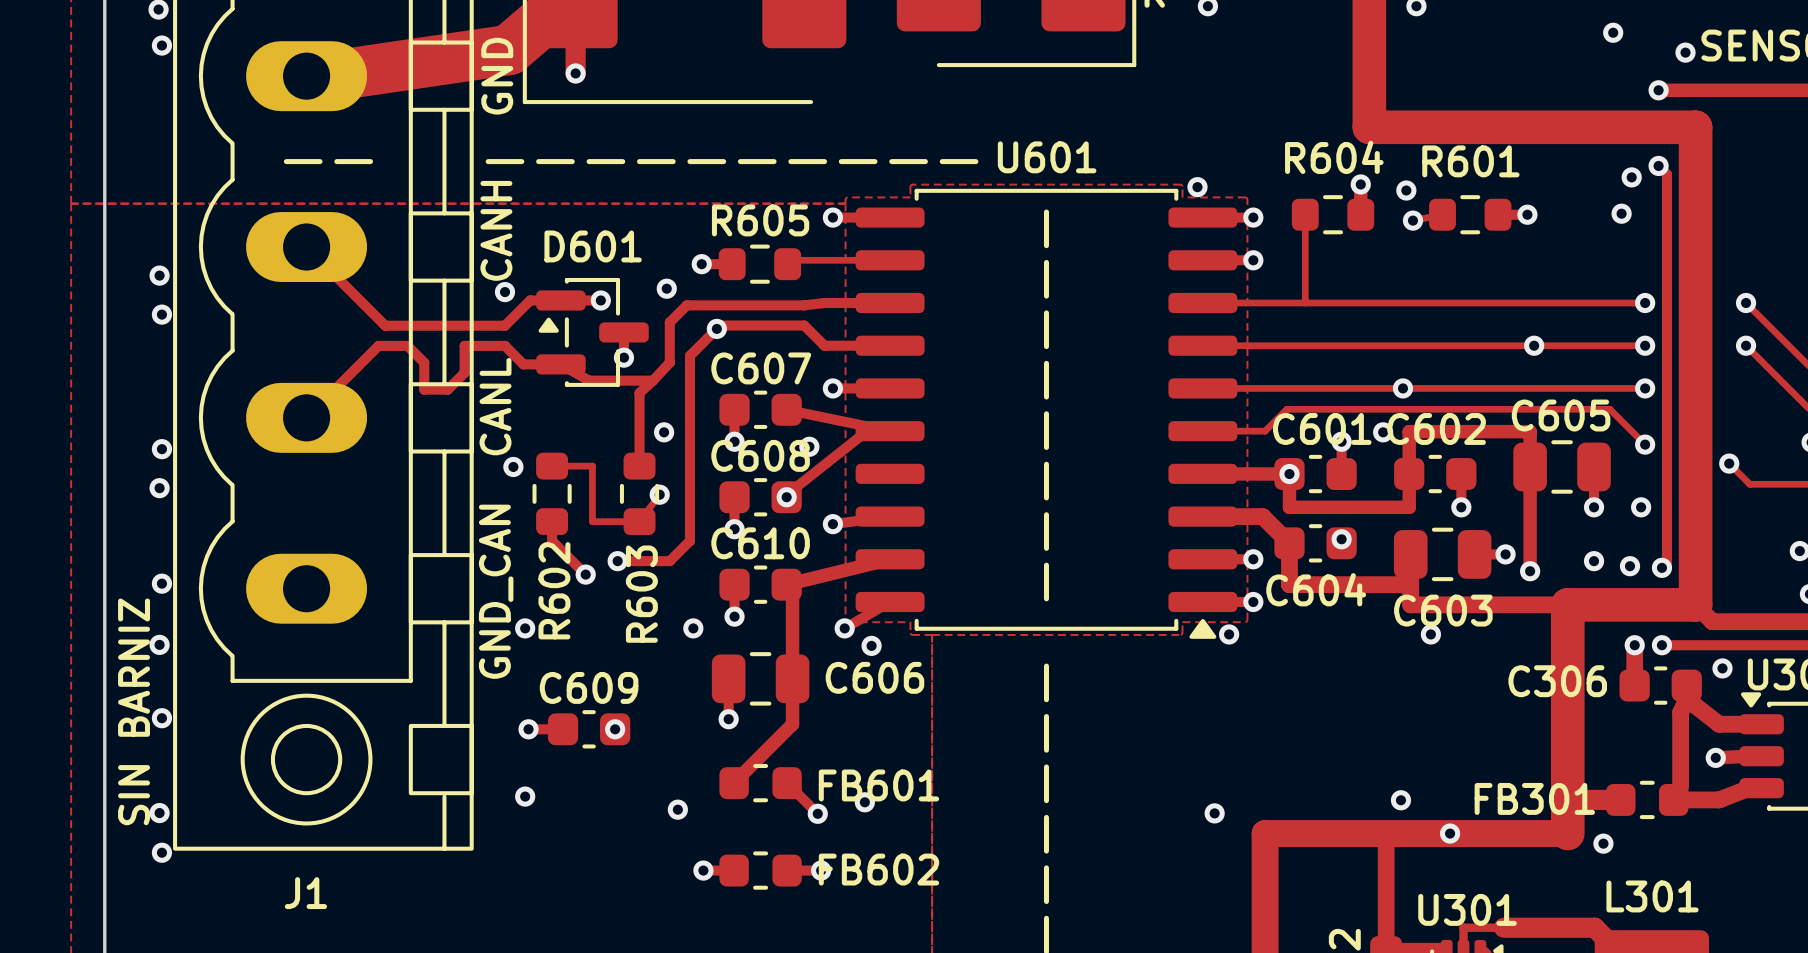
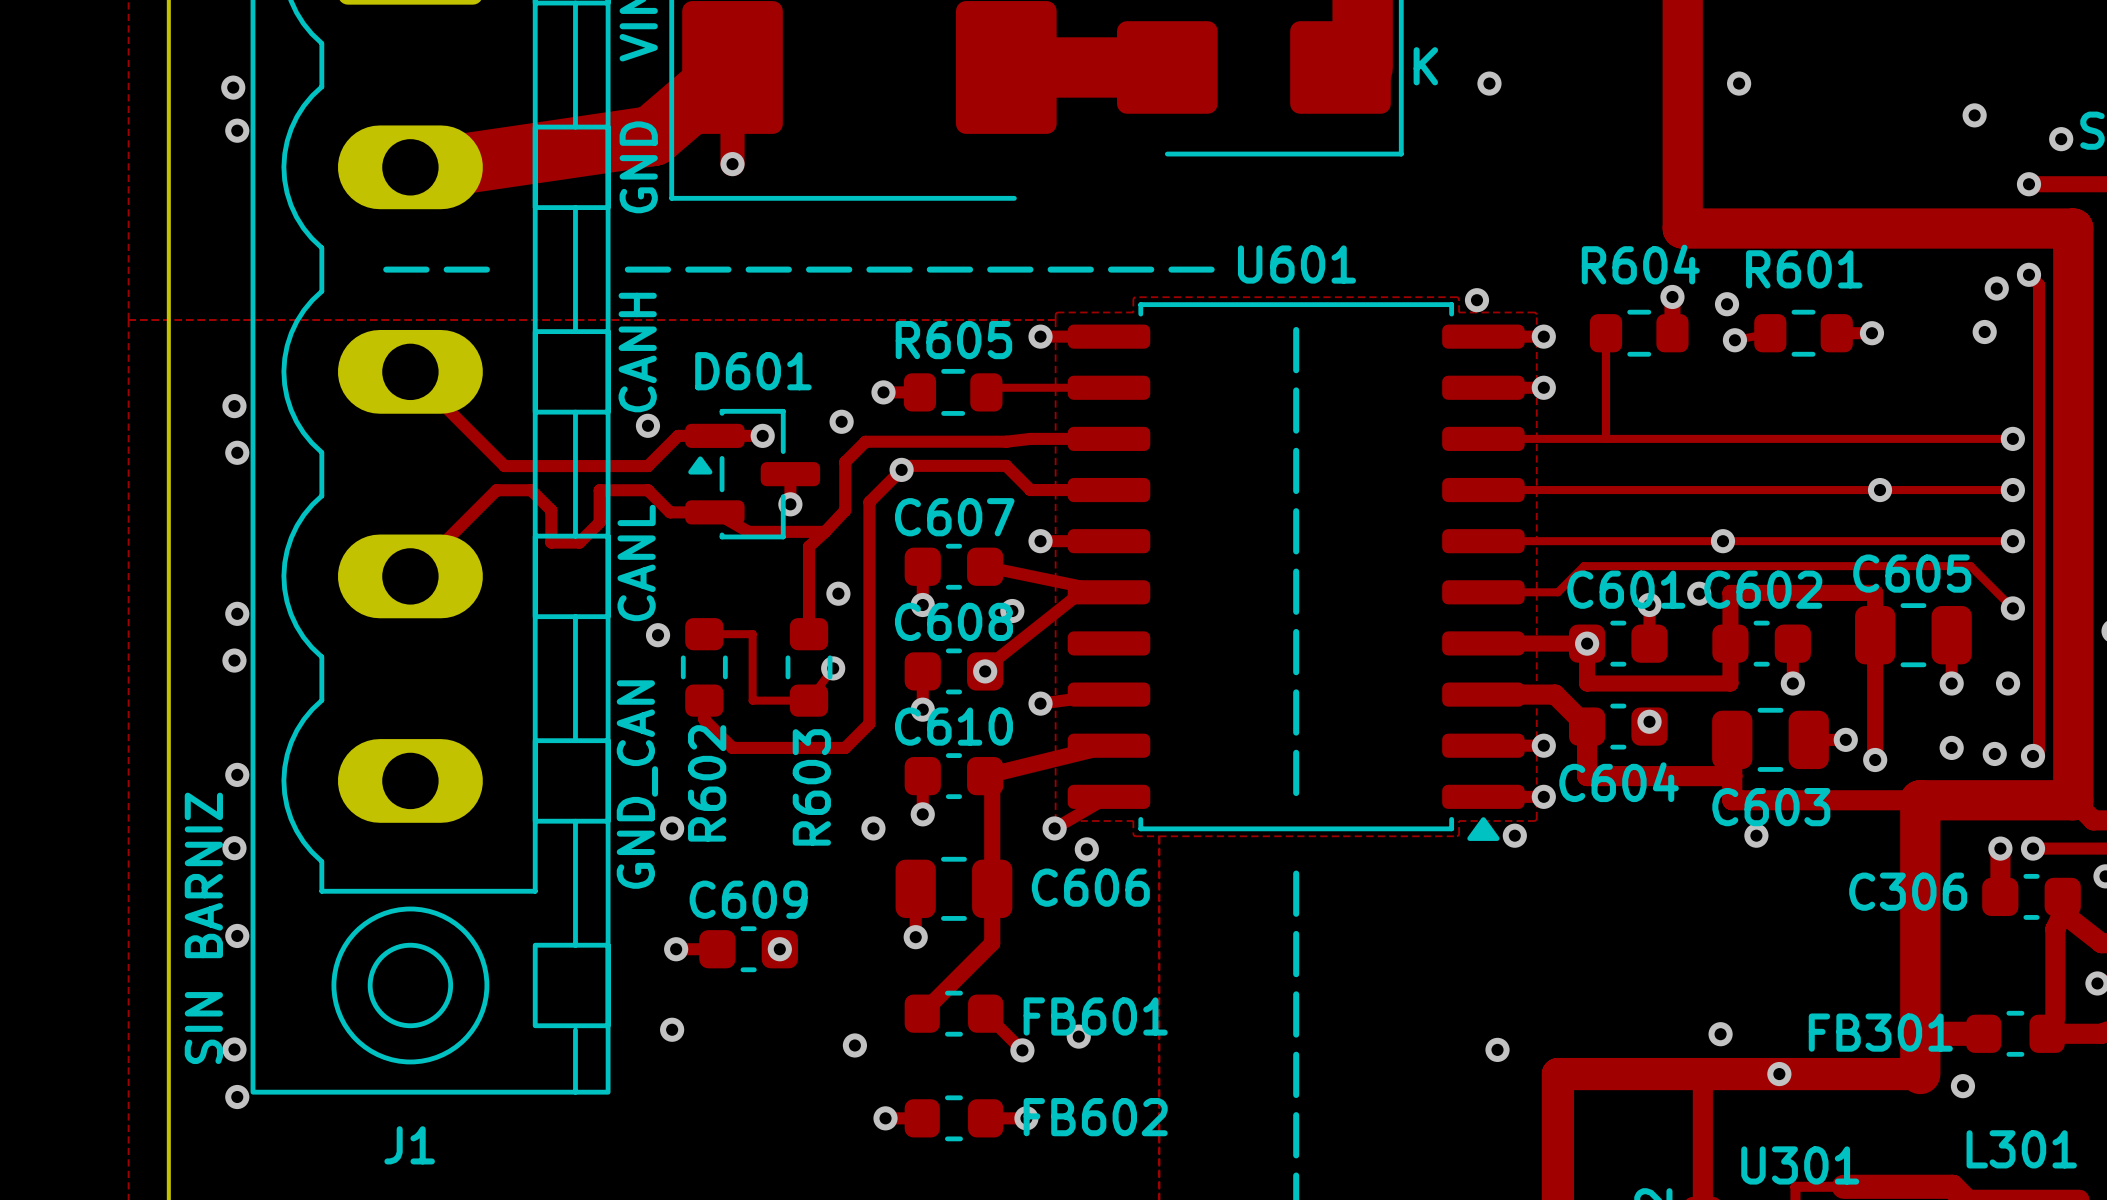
track: (552, 537) (552, 540) (585, 574) -> (704, 719) (732, 747) (782, 747)
via: (617, 561) -> none
via: (585, 574) -> none

